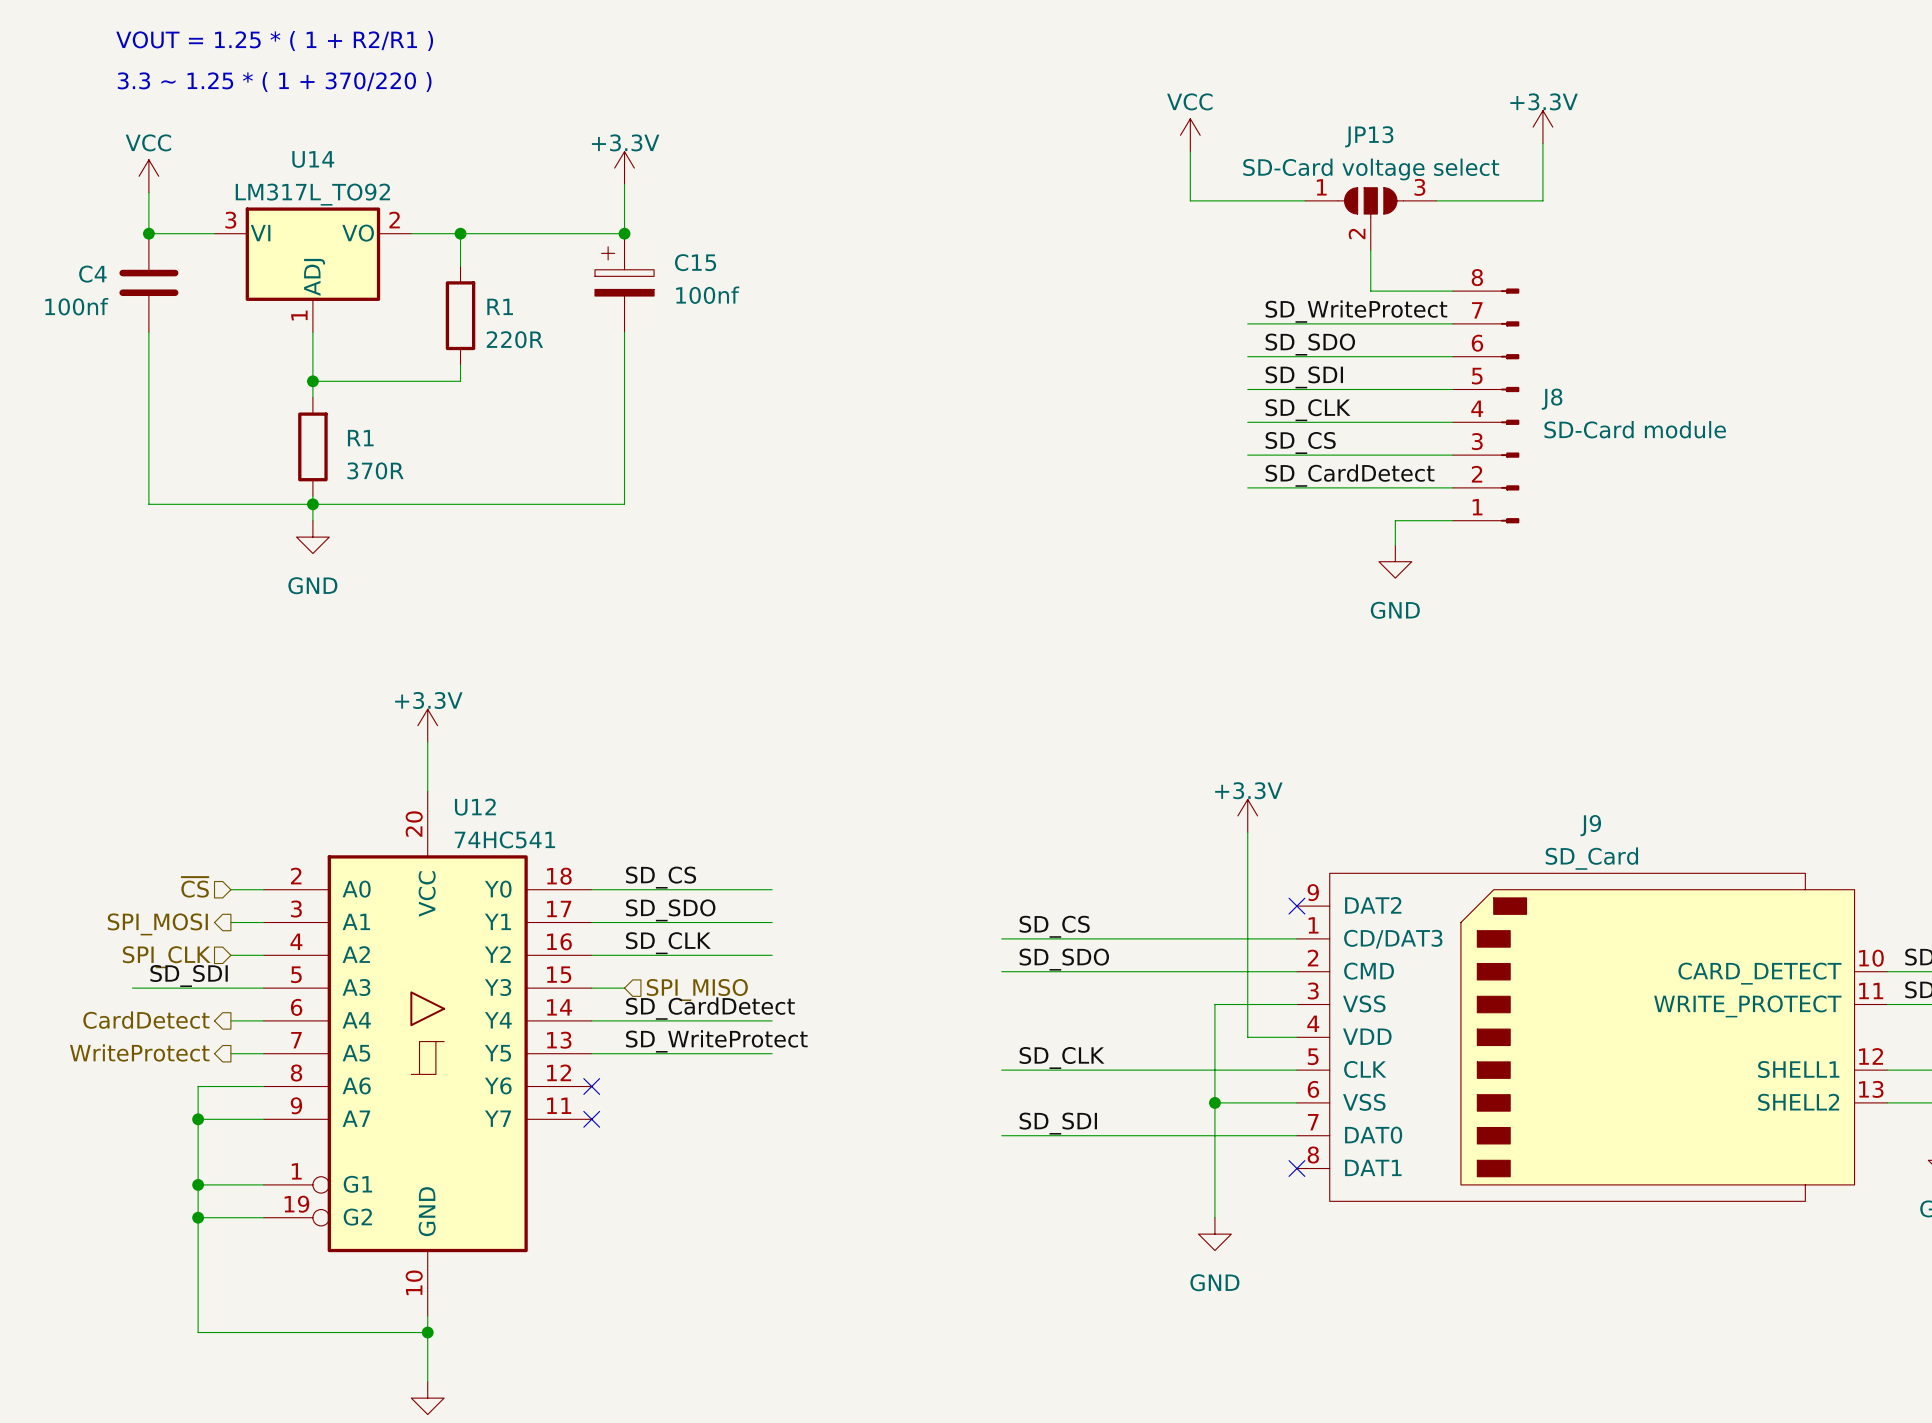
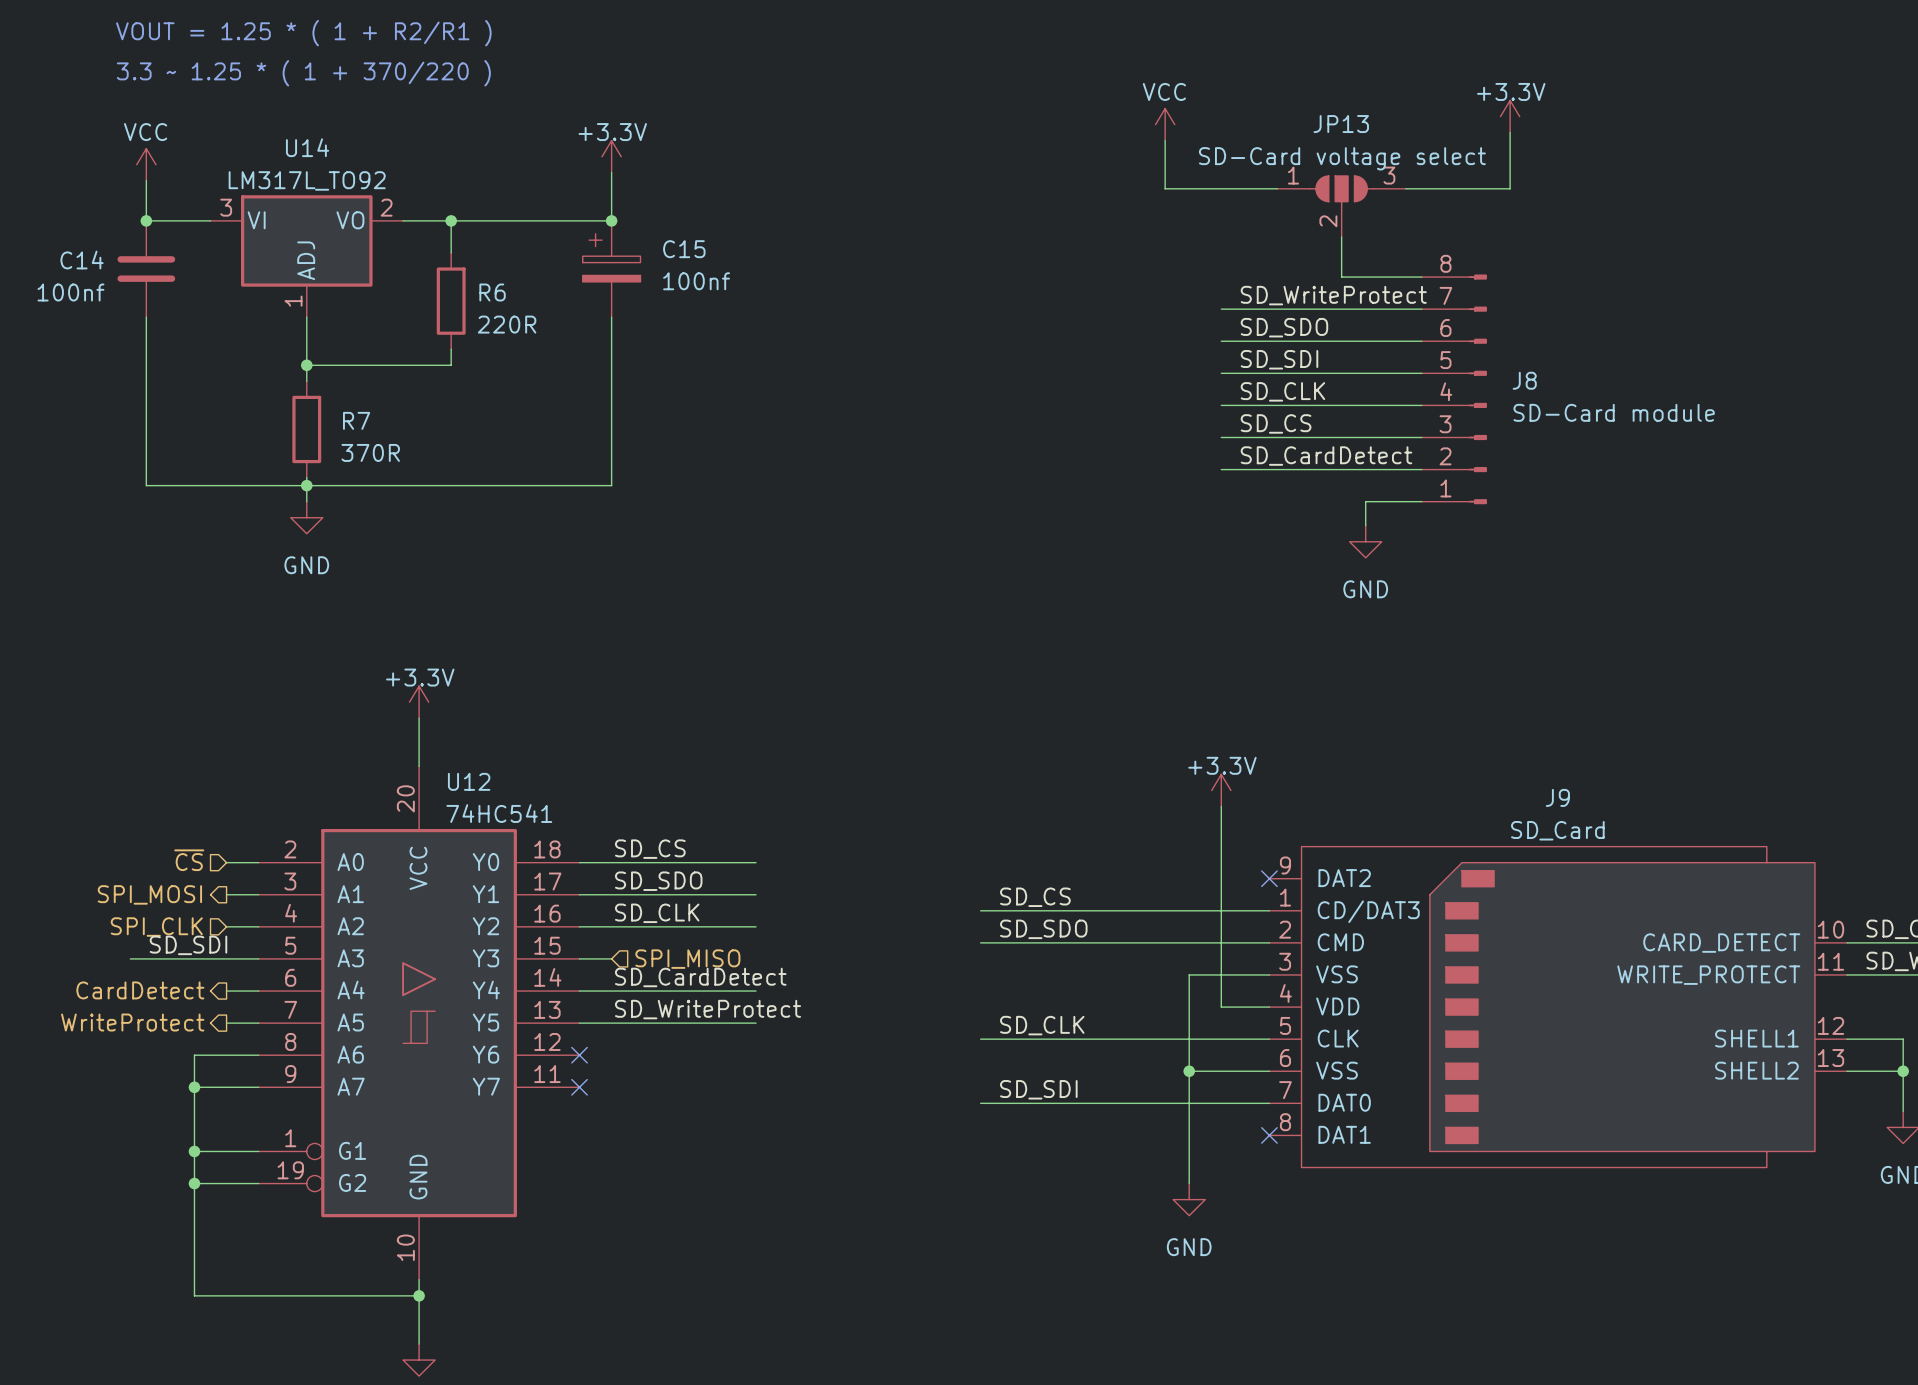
C4 name: C4 (92, 274) -> C14 (82, 260)
R1 name: R1 (500, 306) -> R6 (492, 292)
R1 name: R1 (360, 438) -> R7 (356, 420)

